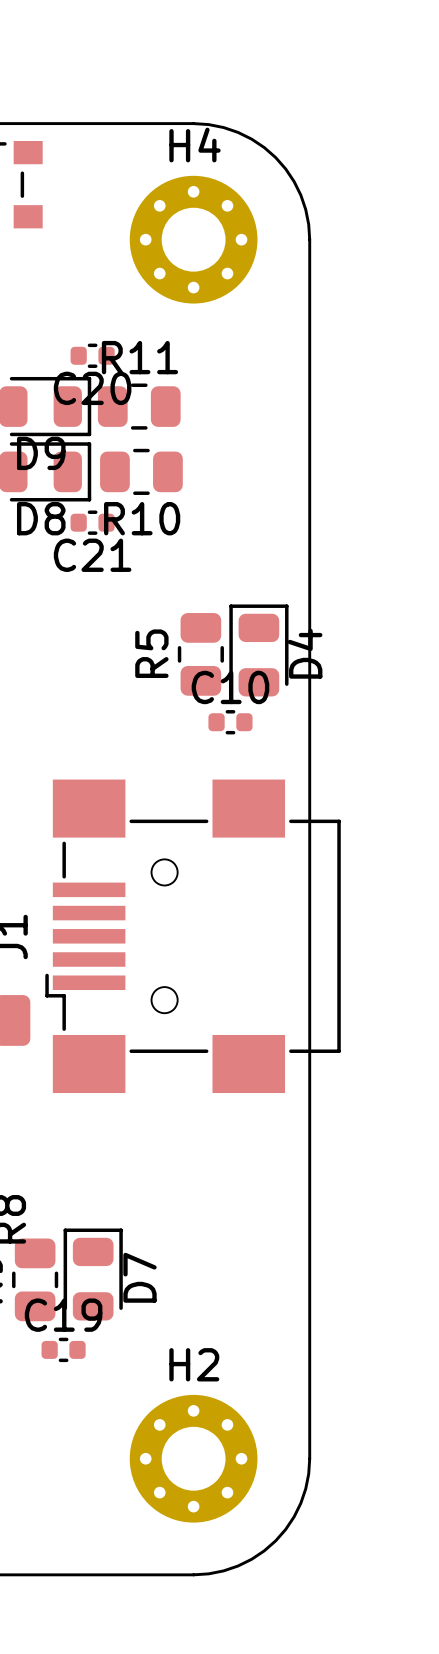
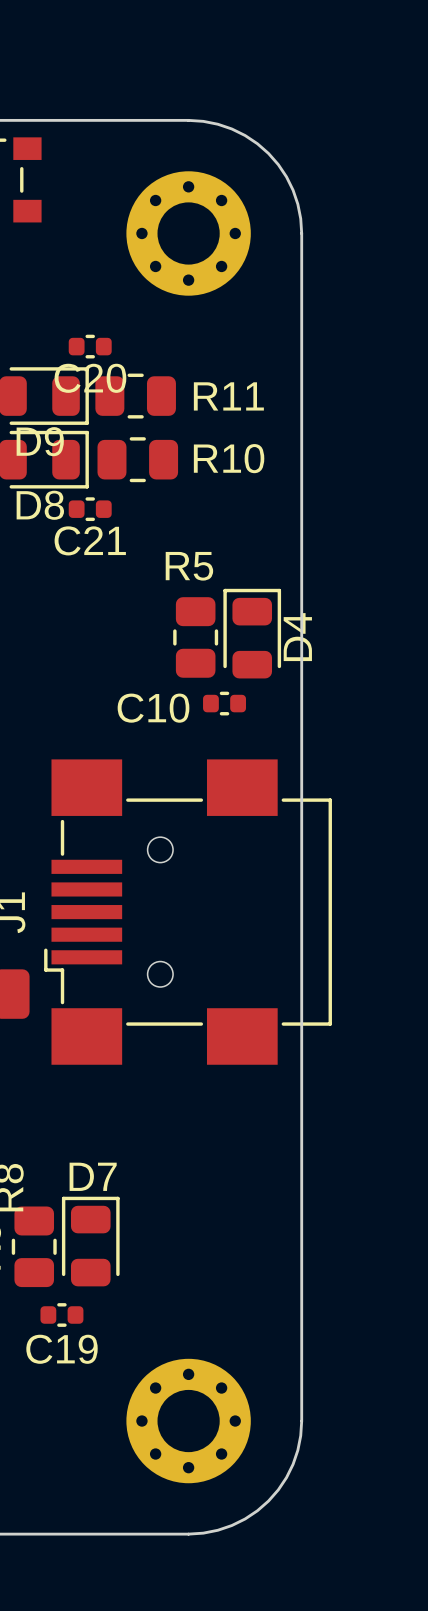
H4 name: H4 (194, 145) -> none
R11 name position: R11 (139, 357) -> R11 (228, 396)
R10 name position: R10 (142, 518) -> R10 (229, 458)
R5 name rotation: 0° (151, 653) -> 90° clockwise (189, 566)
R5 name position: R5 (151, 653) -> R5 (189, 566)
C10 name position: C10 (230, 687) -> C10 (153, 708)
D7 name rotation: 0° (139, 1277) -> 90° clockwise (93, 1176)
D7 name position: D7 (139, 1277) -> D7 (93, 1176)
C19 name position: C19 (63, 1315) -> C19 (62, 1349)
H2 name: H2 (194, 1364) -> none

